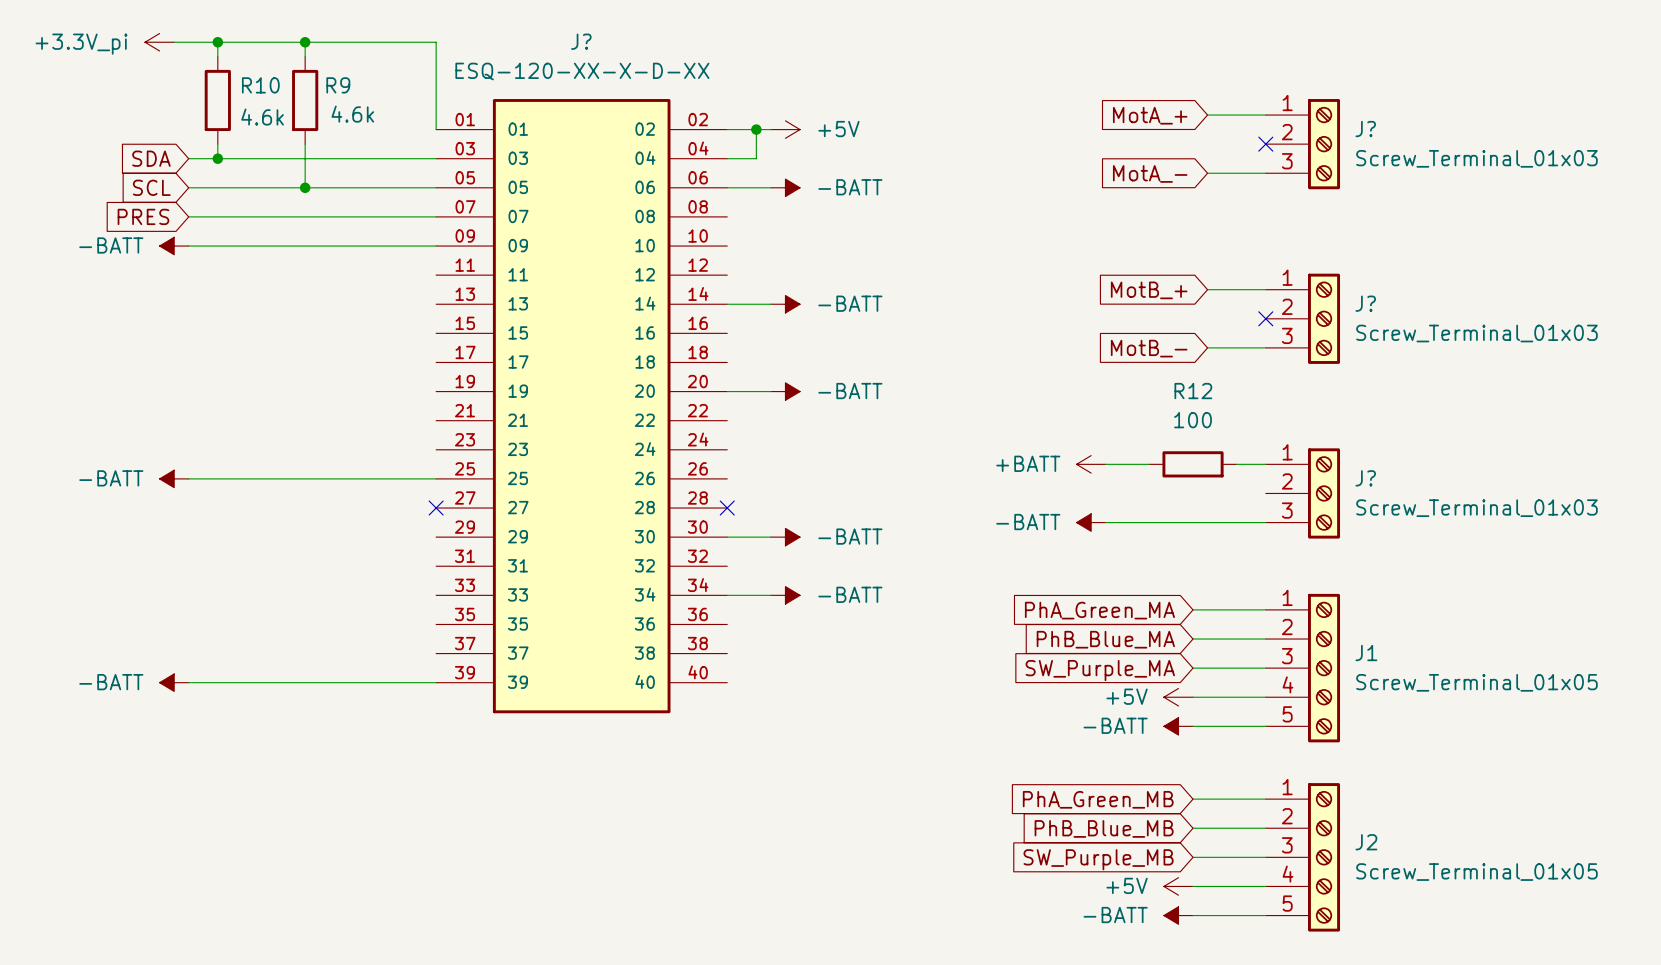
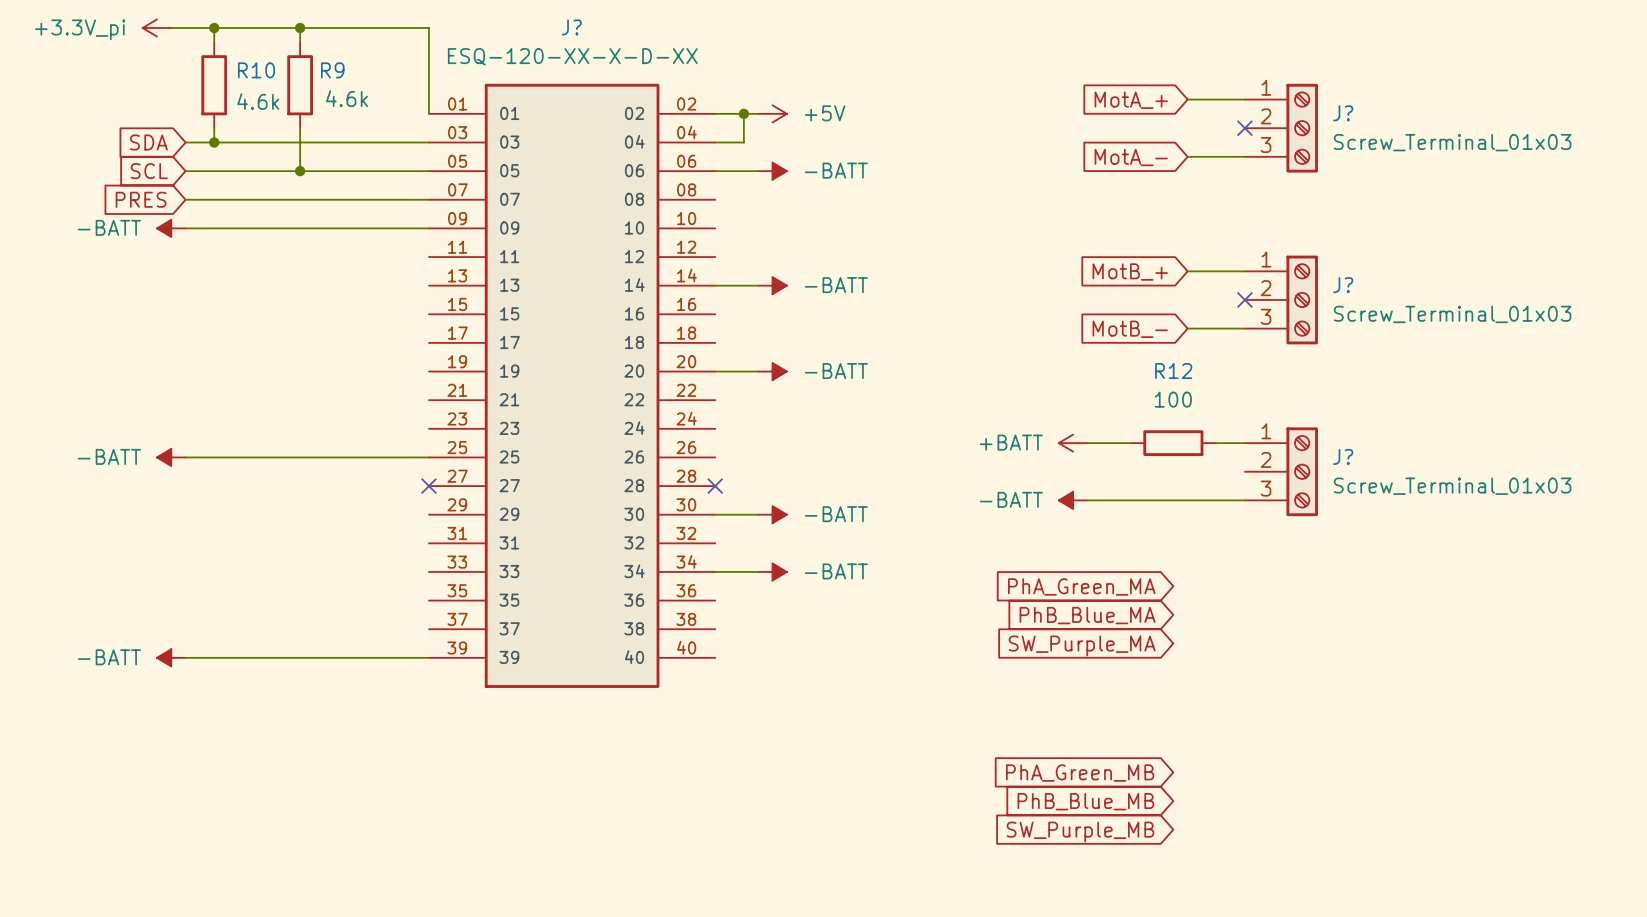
wire: (1193, 609) (1265, 609) -> none
wire: (1193, 639) (1265, 639) -> none
wire: (1193, 668) (1265, 668) -> none
J1: Screw_Terminal_01x05 (1302, 668) -> none
power symbol: +5V (1178, 697) -> none
wire: (1193, 697) (1265, 697) -> none
power symbol: -BATT (1178, 726) -> none
wire: (1193, 726) (1265, 726) -> none
wire: (1193, 799) (1265, 799) -> none
wire: (1193, 828) (1265, 828) -> none
wire: (1193, 857) (1265, 857) -> none
J2: Screw_Terminal_01x05 (1302, 857) -> none
power symbol: +5V (1178, 886) -> none
wire: (1193, 886) (1265, 886) -> none
power symbol: -BATT (1178, 915) -> none
wire: (1193, 915) (1265, 915) -> none

